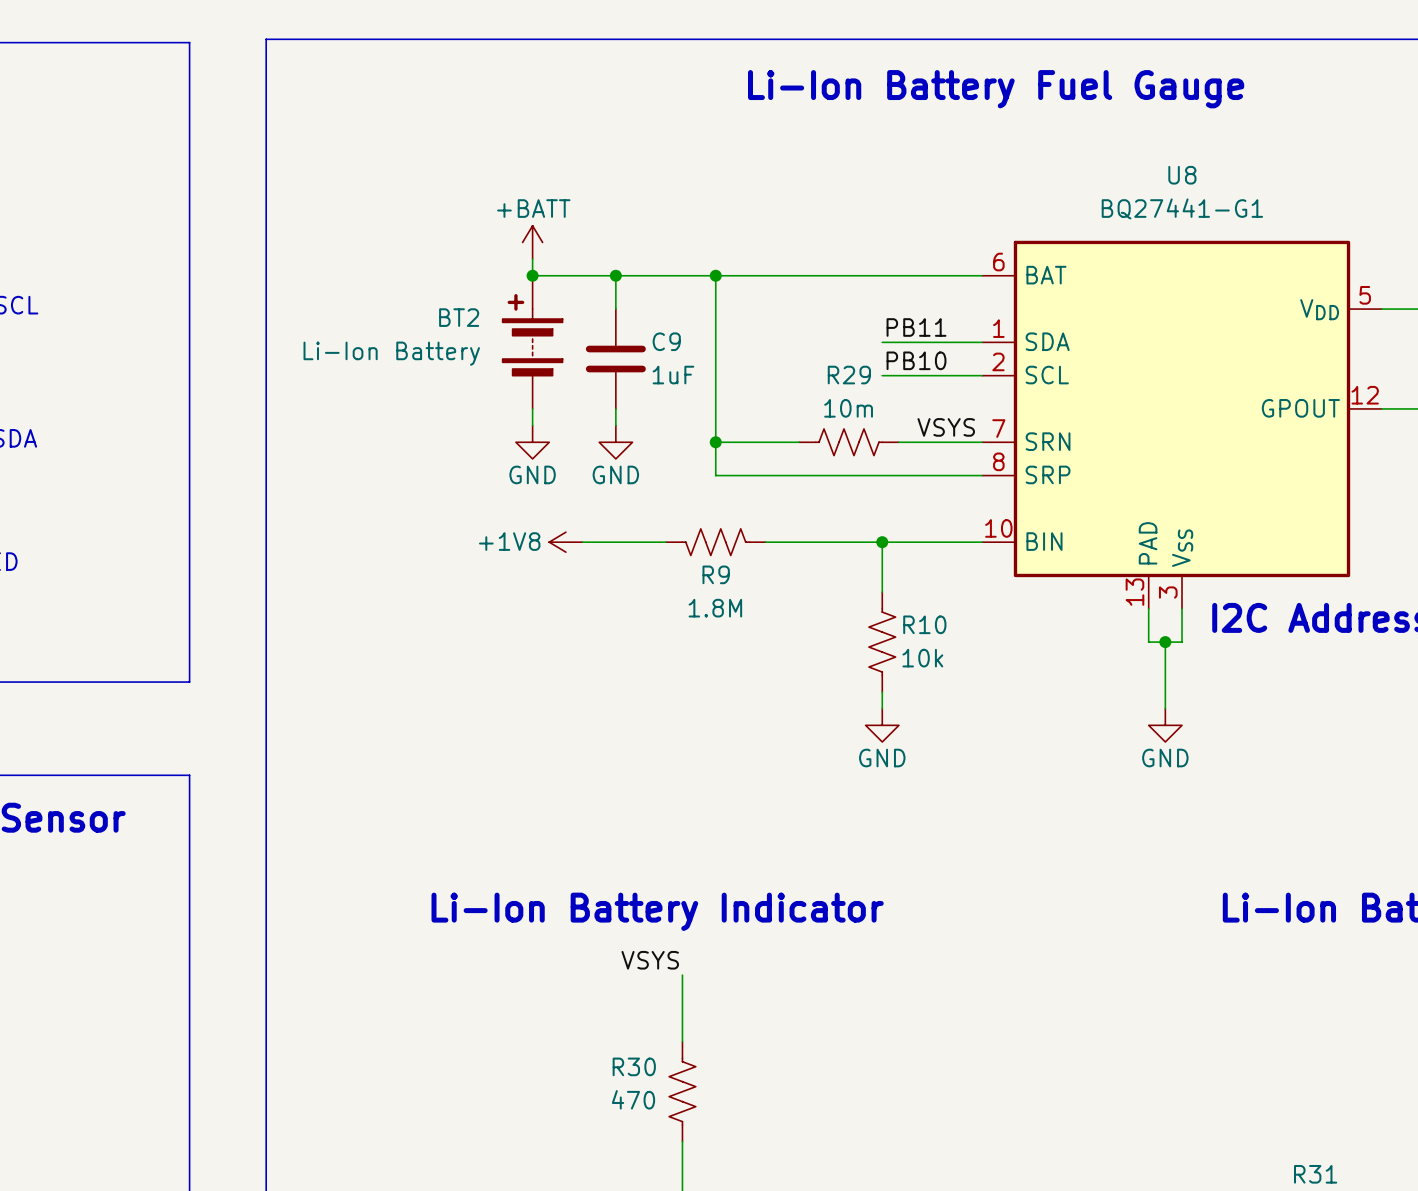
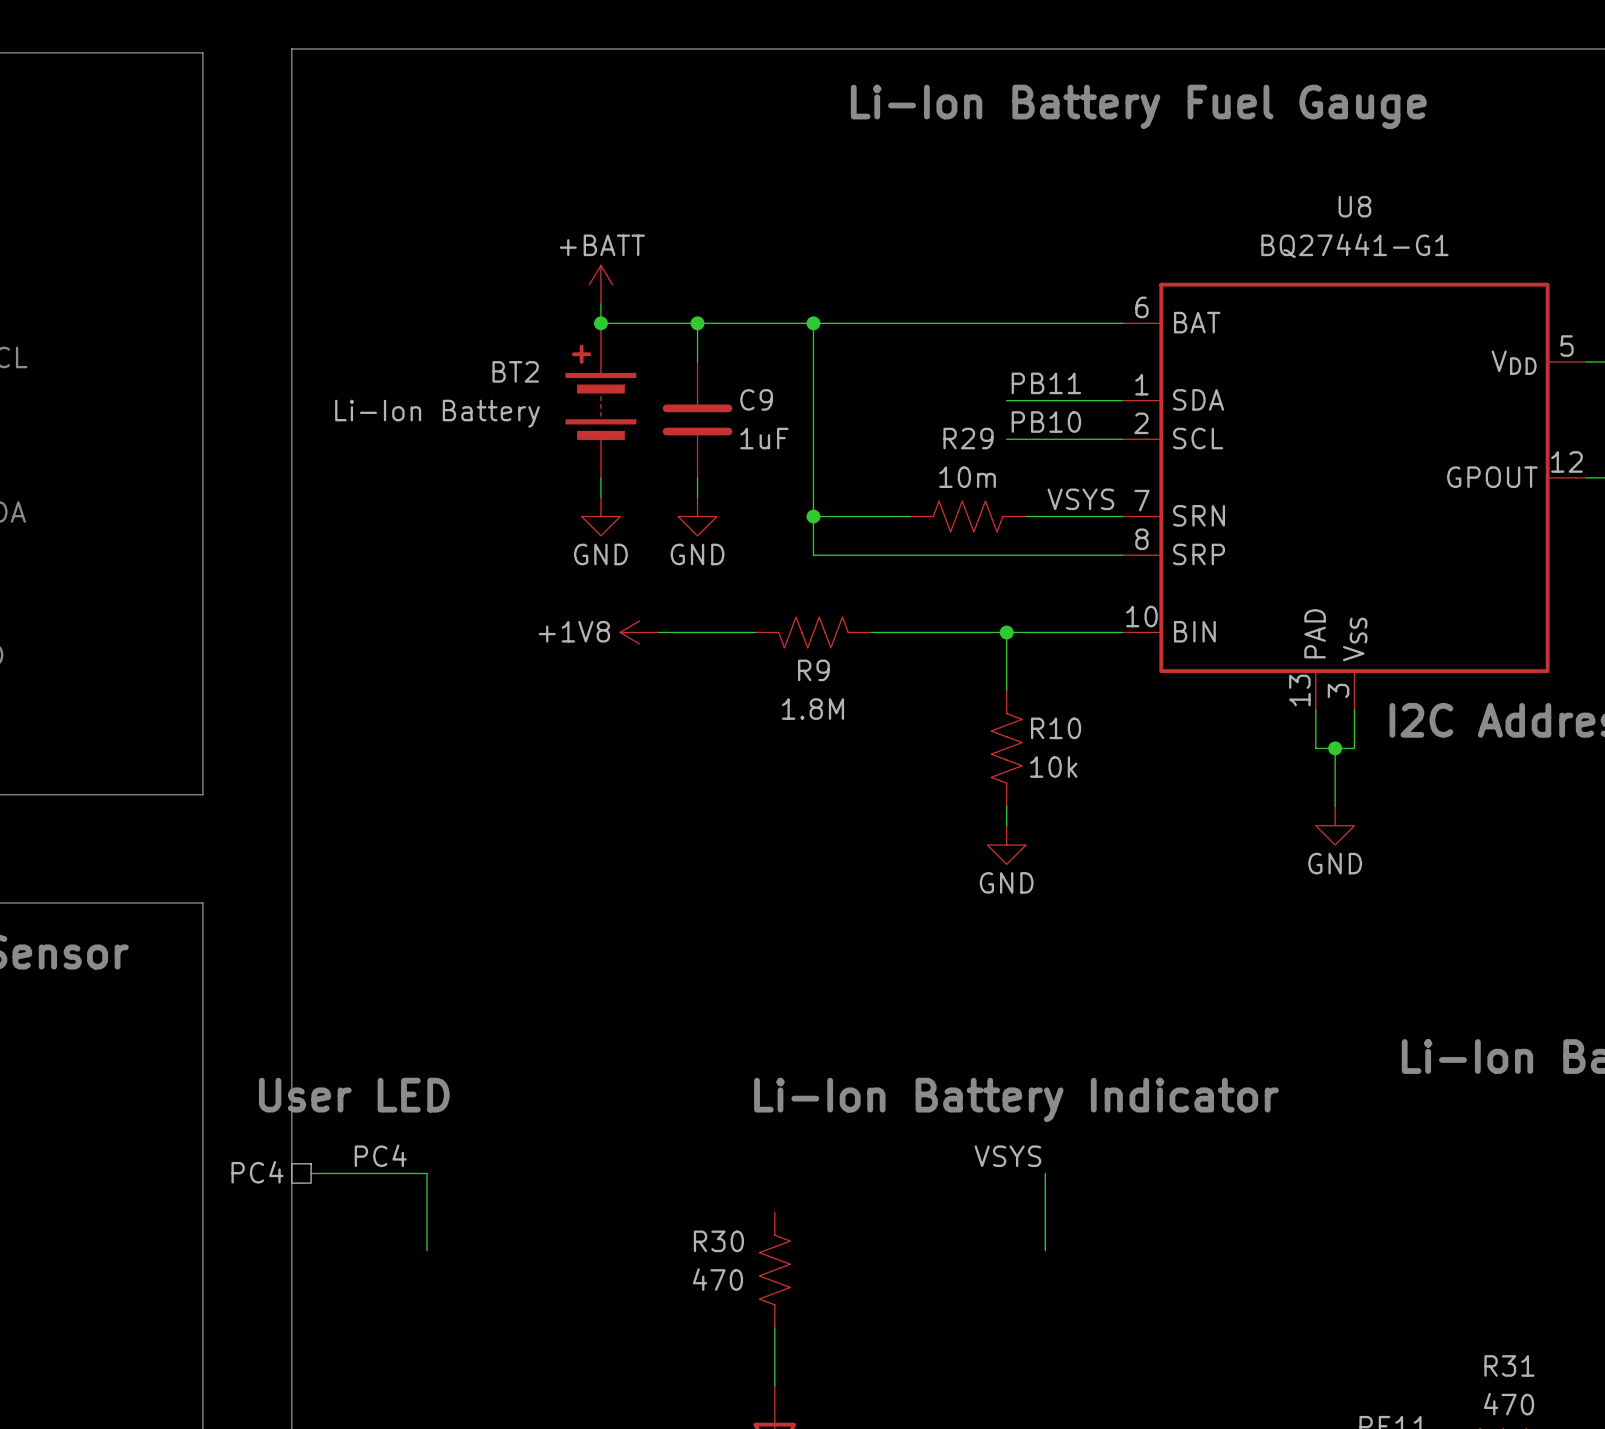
power symbol position: GND (1165, 725) -> GND (1335, 825)
text position: Li-Ion Battery Indicator (657, 911) -> Li-Ion Battery Indicator (1016, 1099)
text: none -> User LED (354, 1095)
label position: VSYS (650, 960) -> VSYS (1007, 1156)
wire: (682, 975) (682, 1041) -> (1045, 1173) (1045, 1250)
label: none -> PC4 (380, 1155)
hierarchical label: none -> PC4 (257, 1172)
wire: none -> (311, 1173) (427, 1173) (427, 1250)

